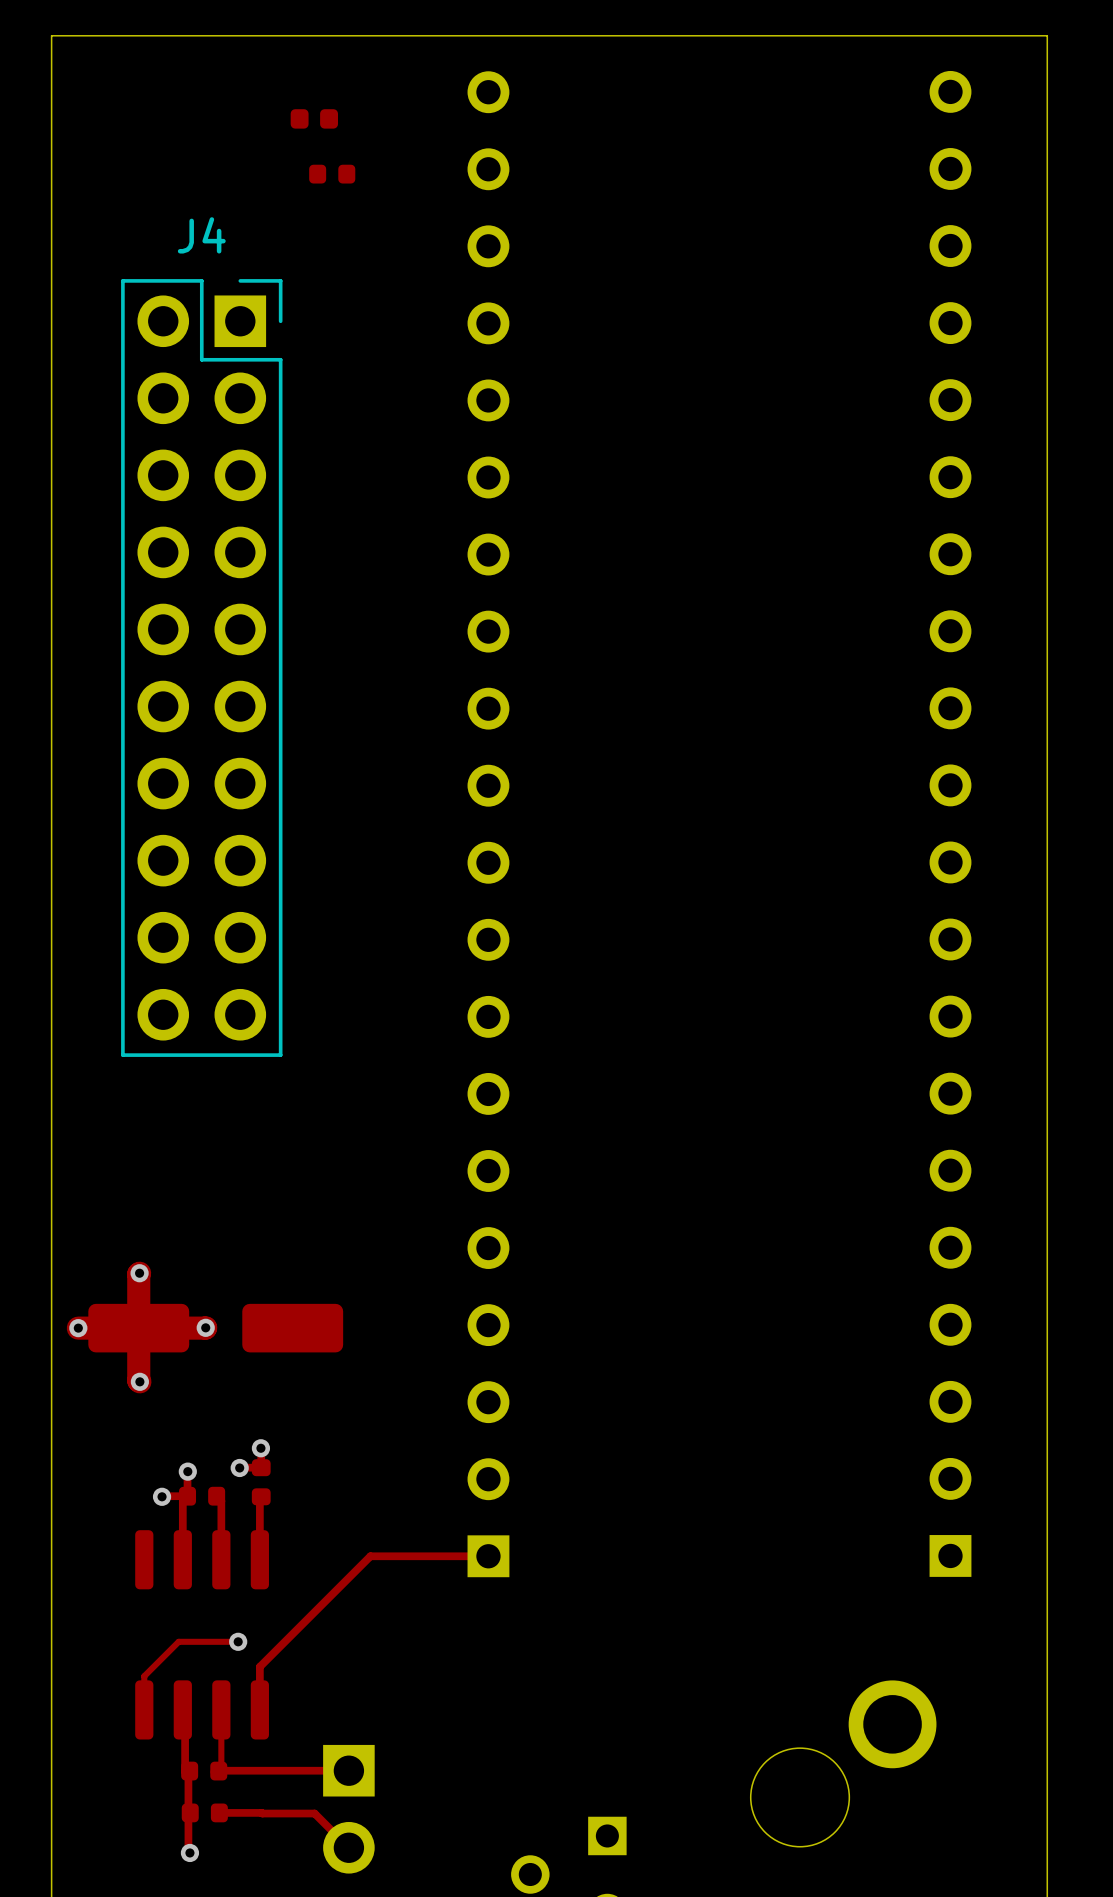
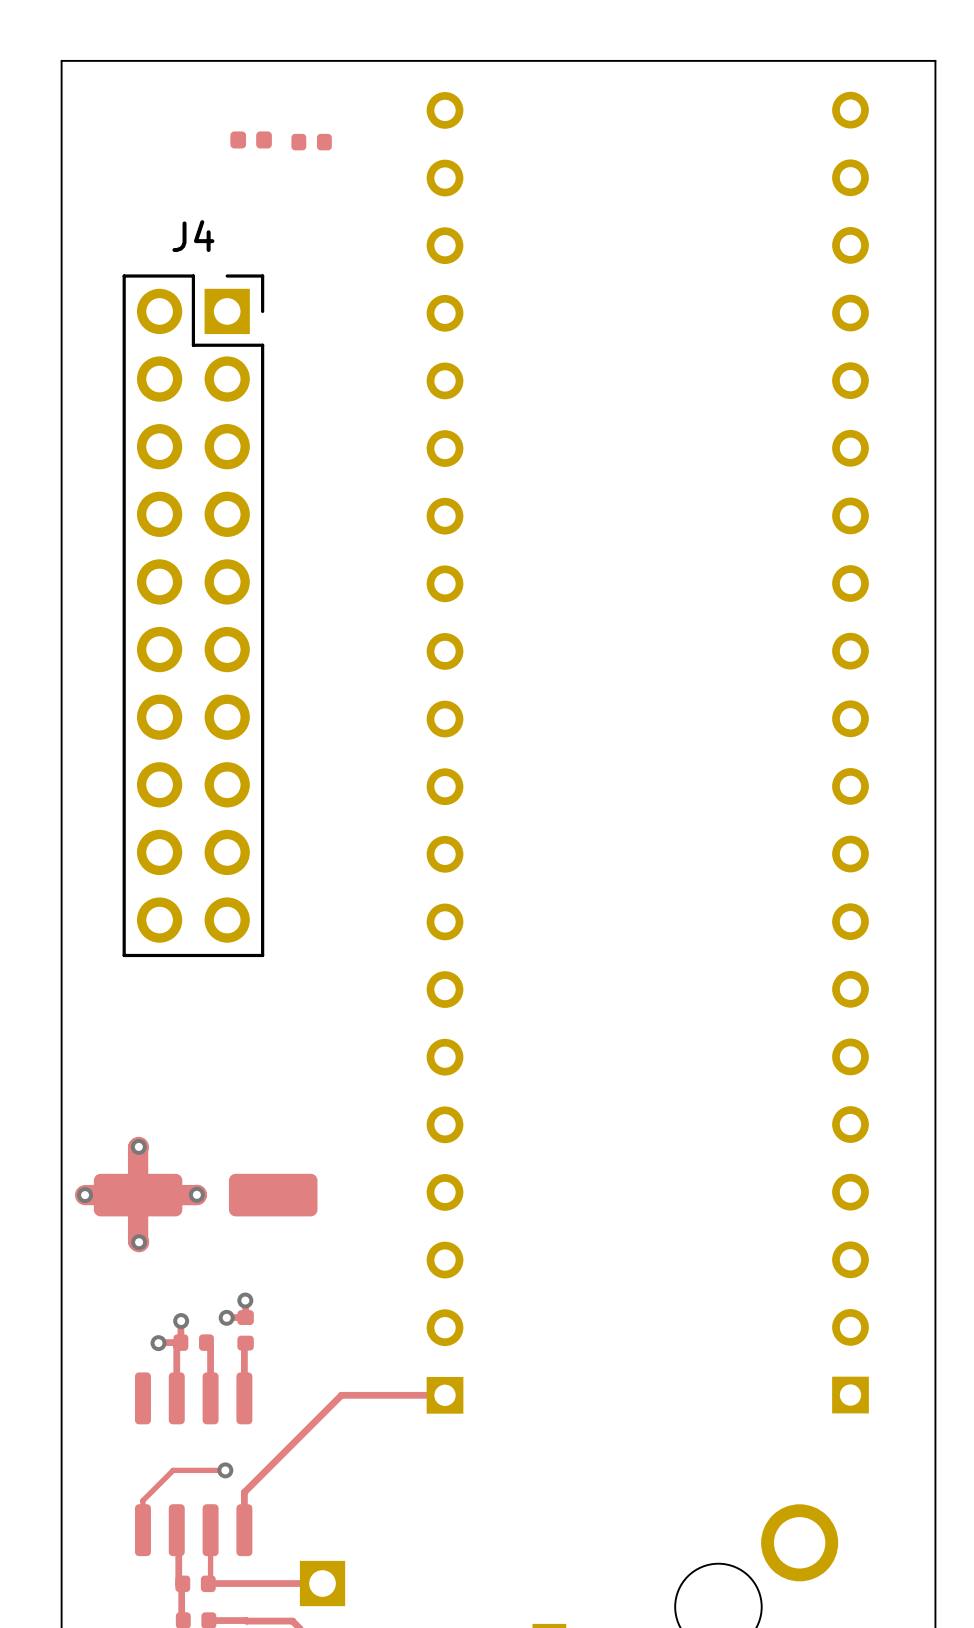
part position: (314, 118) -> (251, 139)
part position: (332, 174) -> (311, 142)

